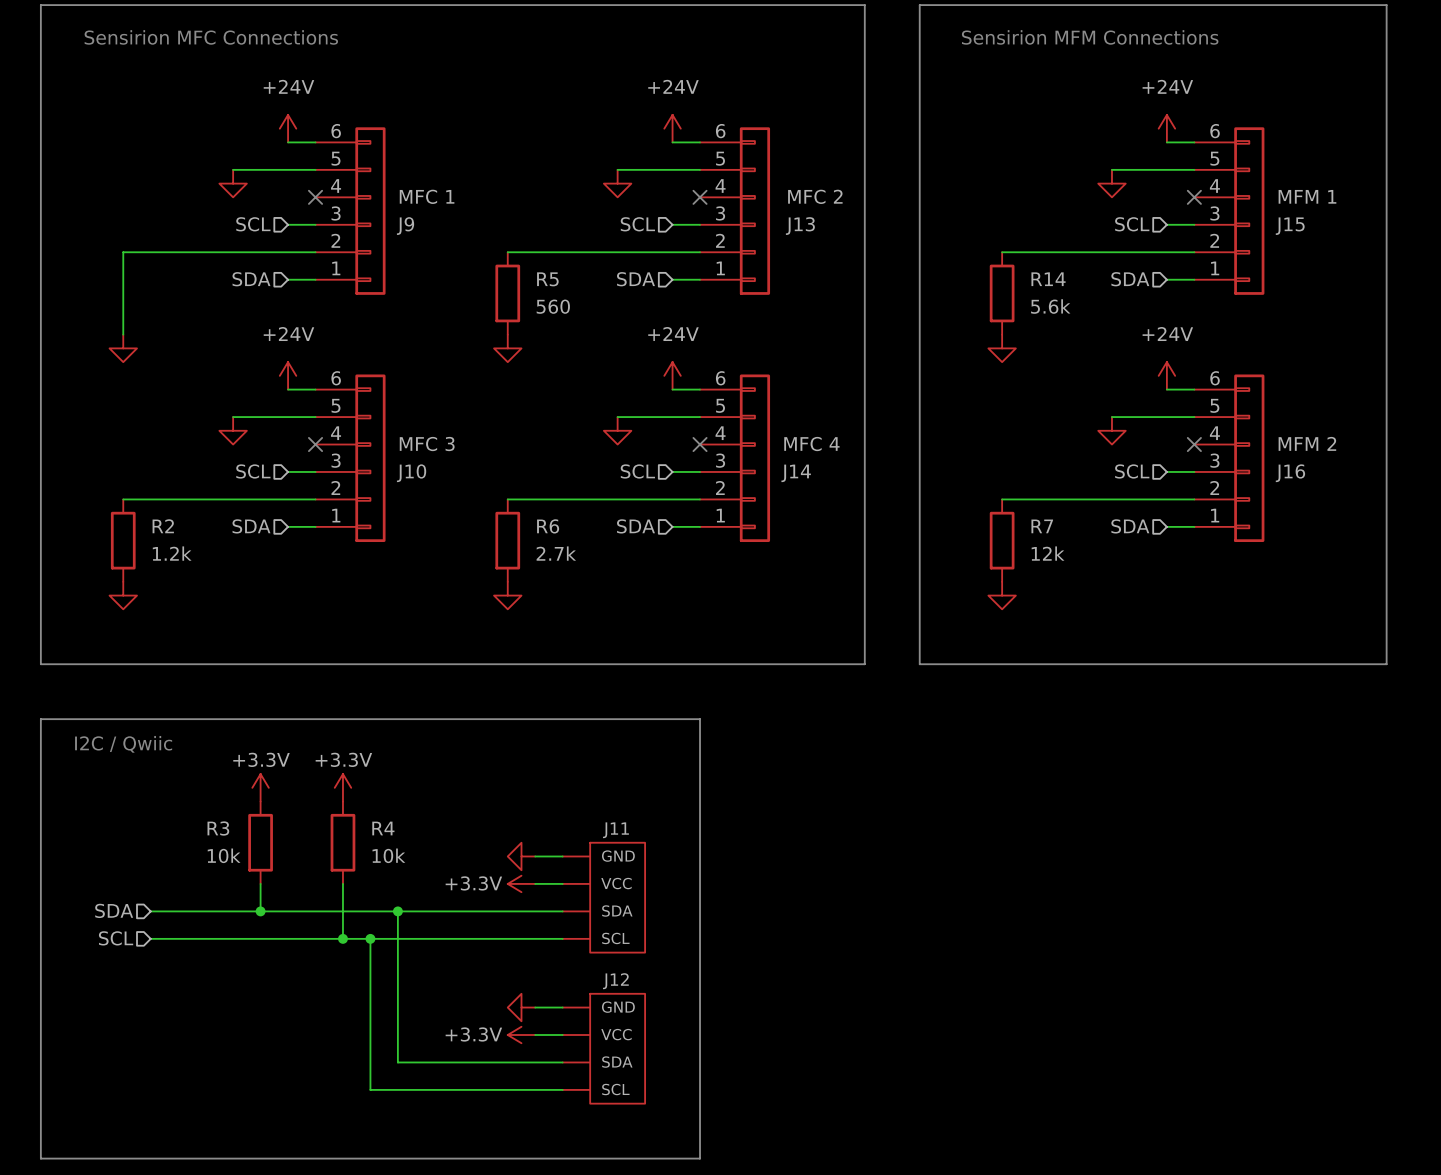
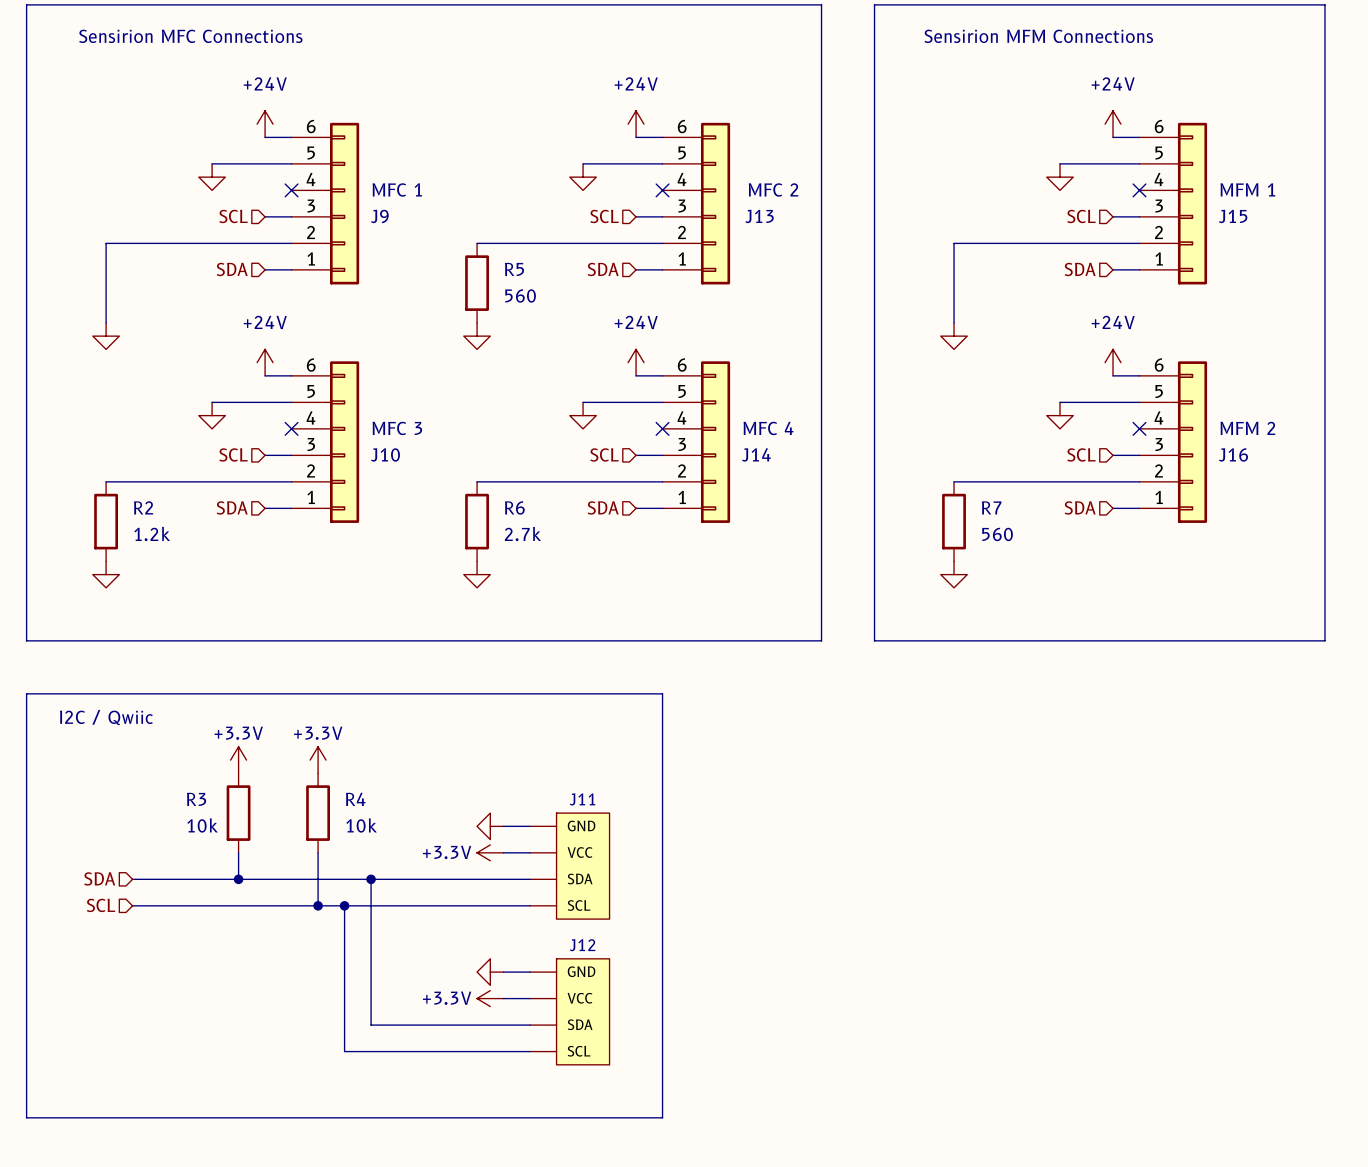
wire: none -> (954, 243) (954, 322)
R14: 5.6k (1002, 293) -> none
R7 value: 12k (1048, 553) -> 560 (997, 534)

